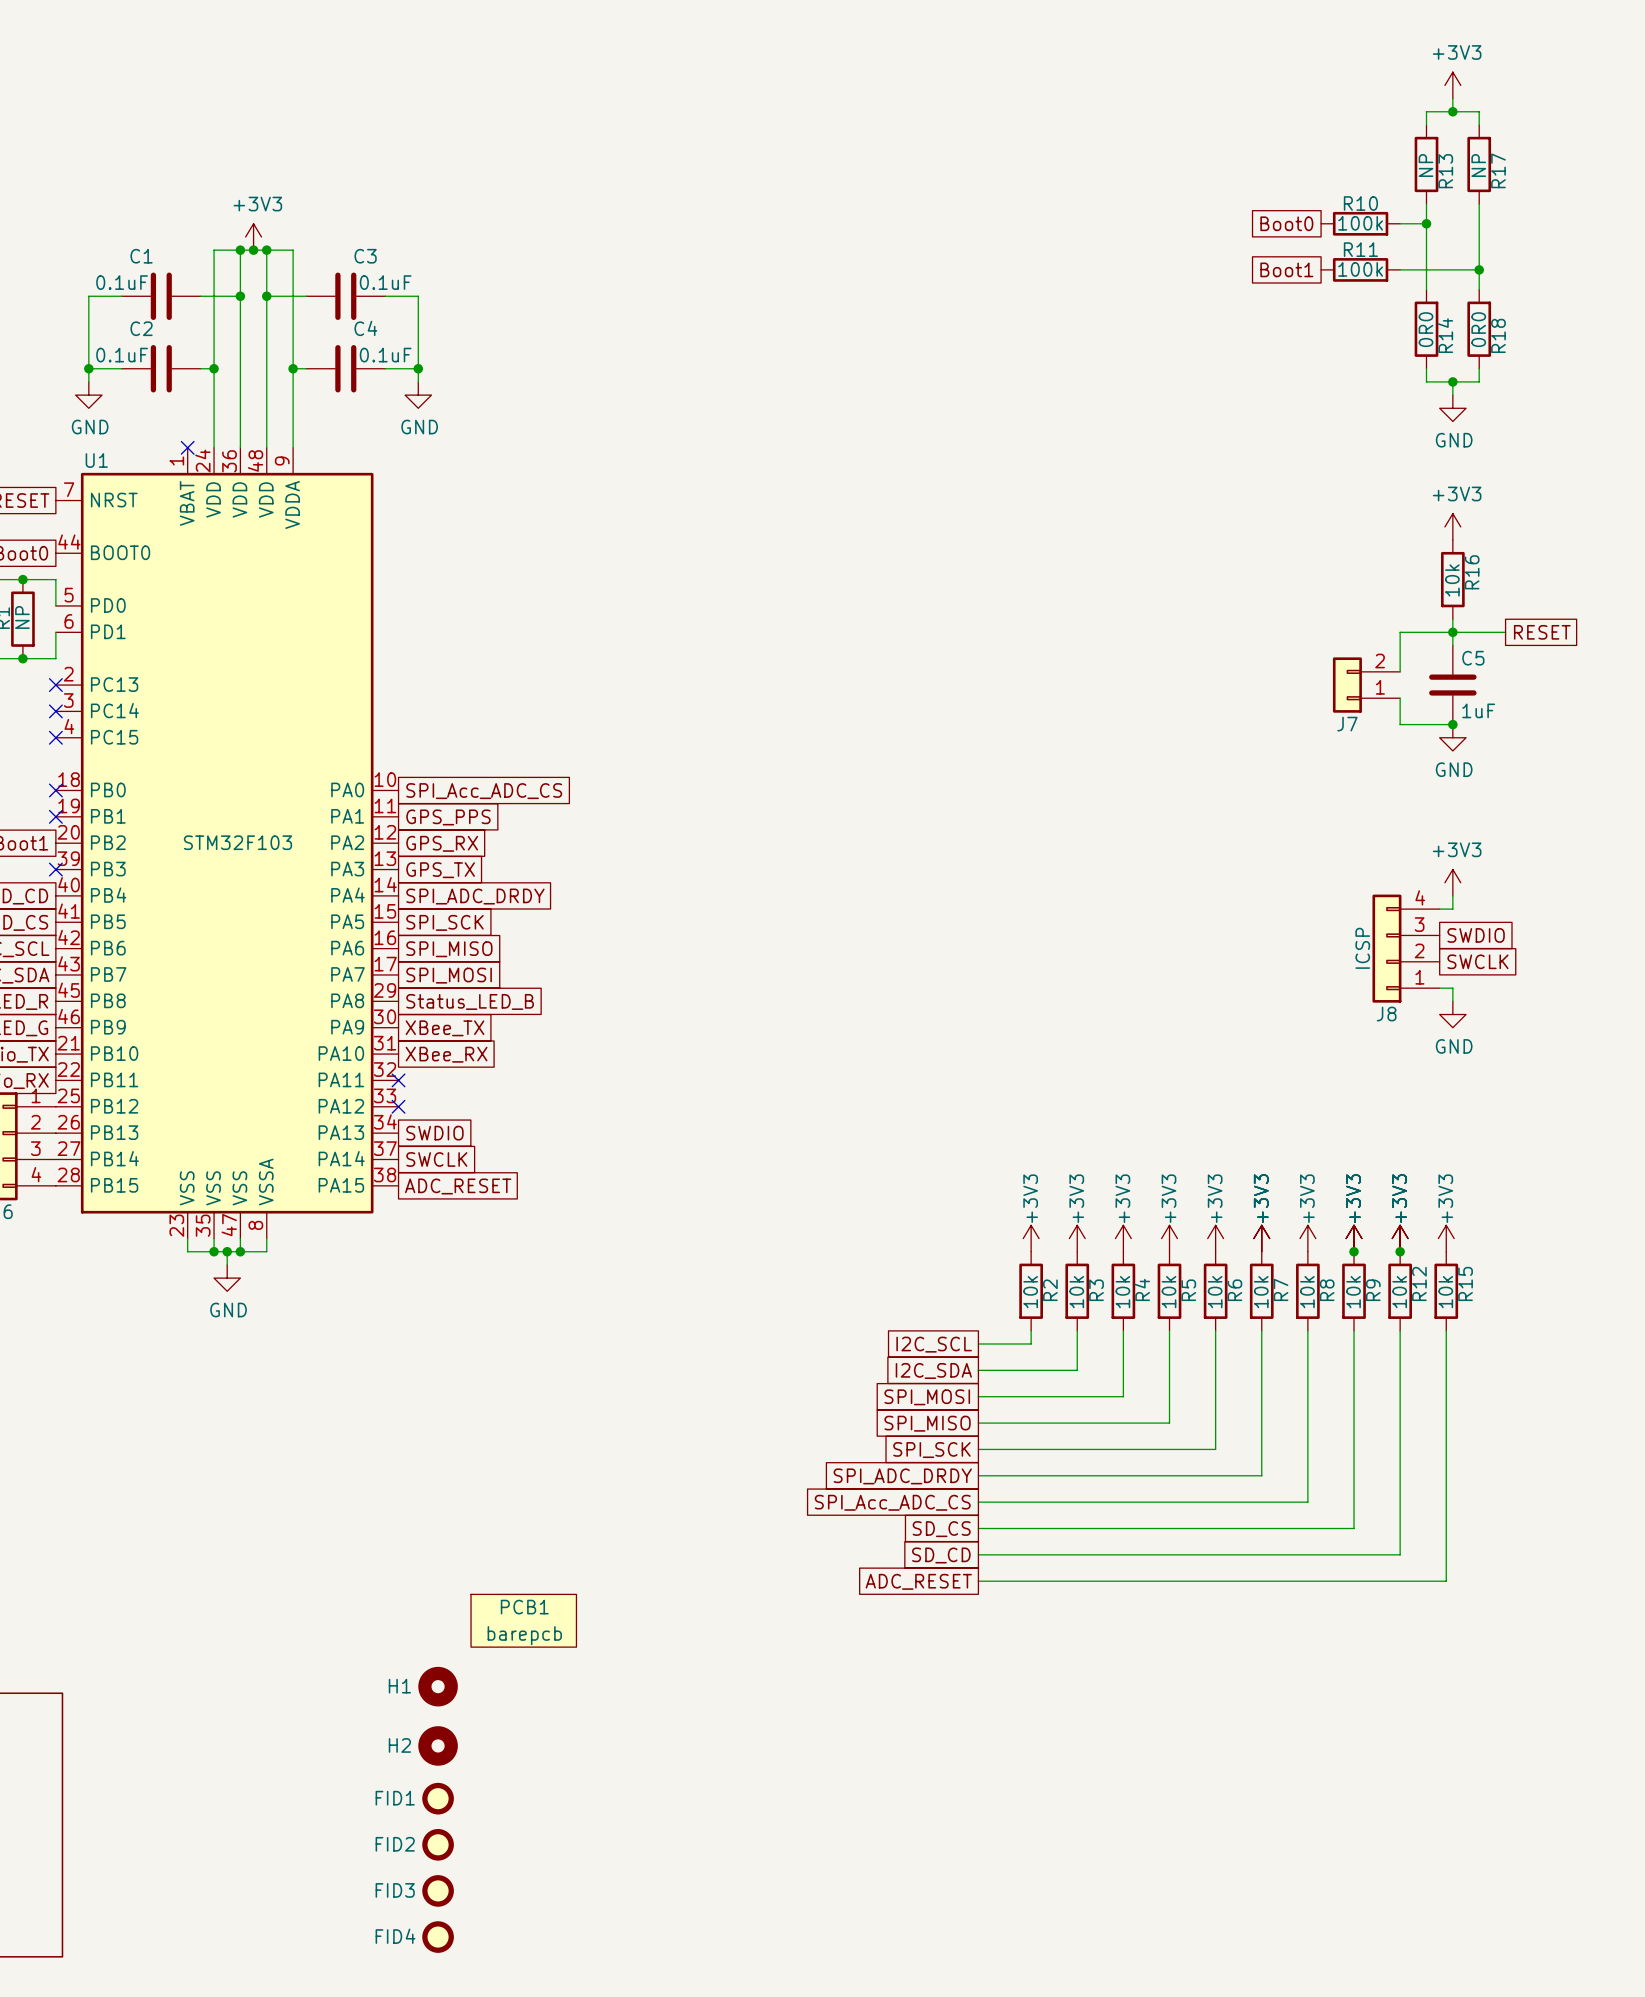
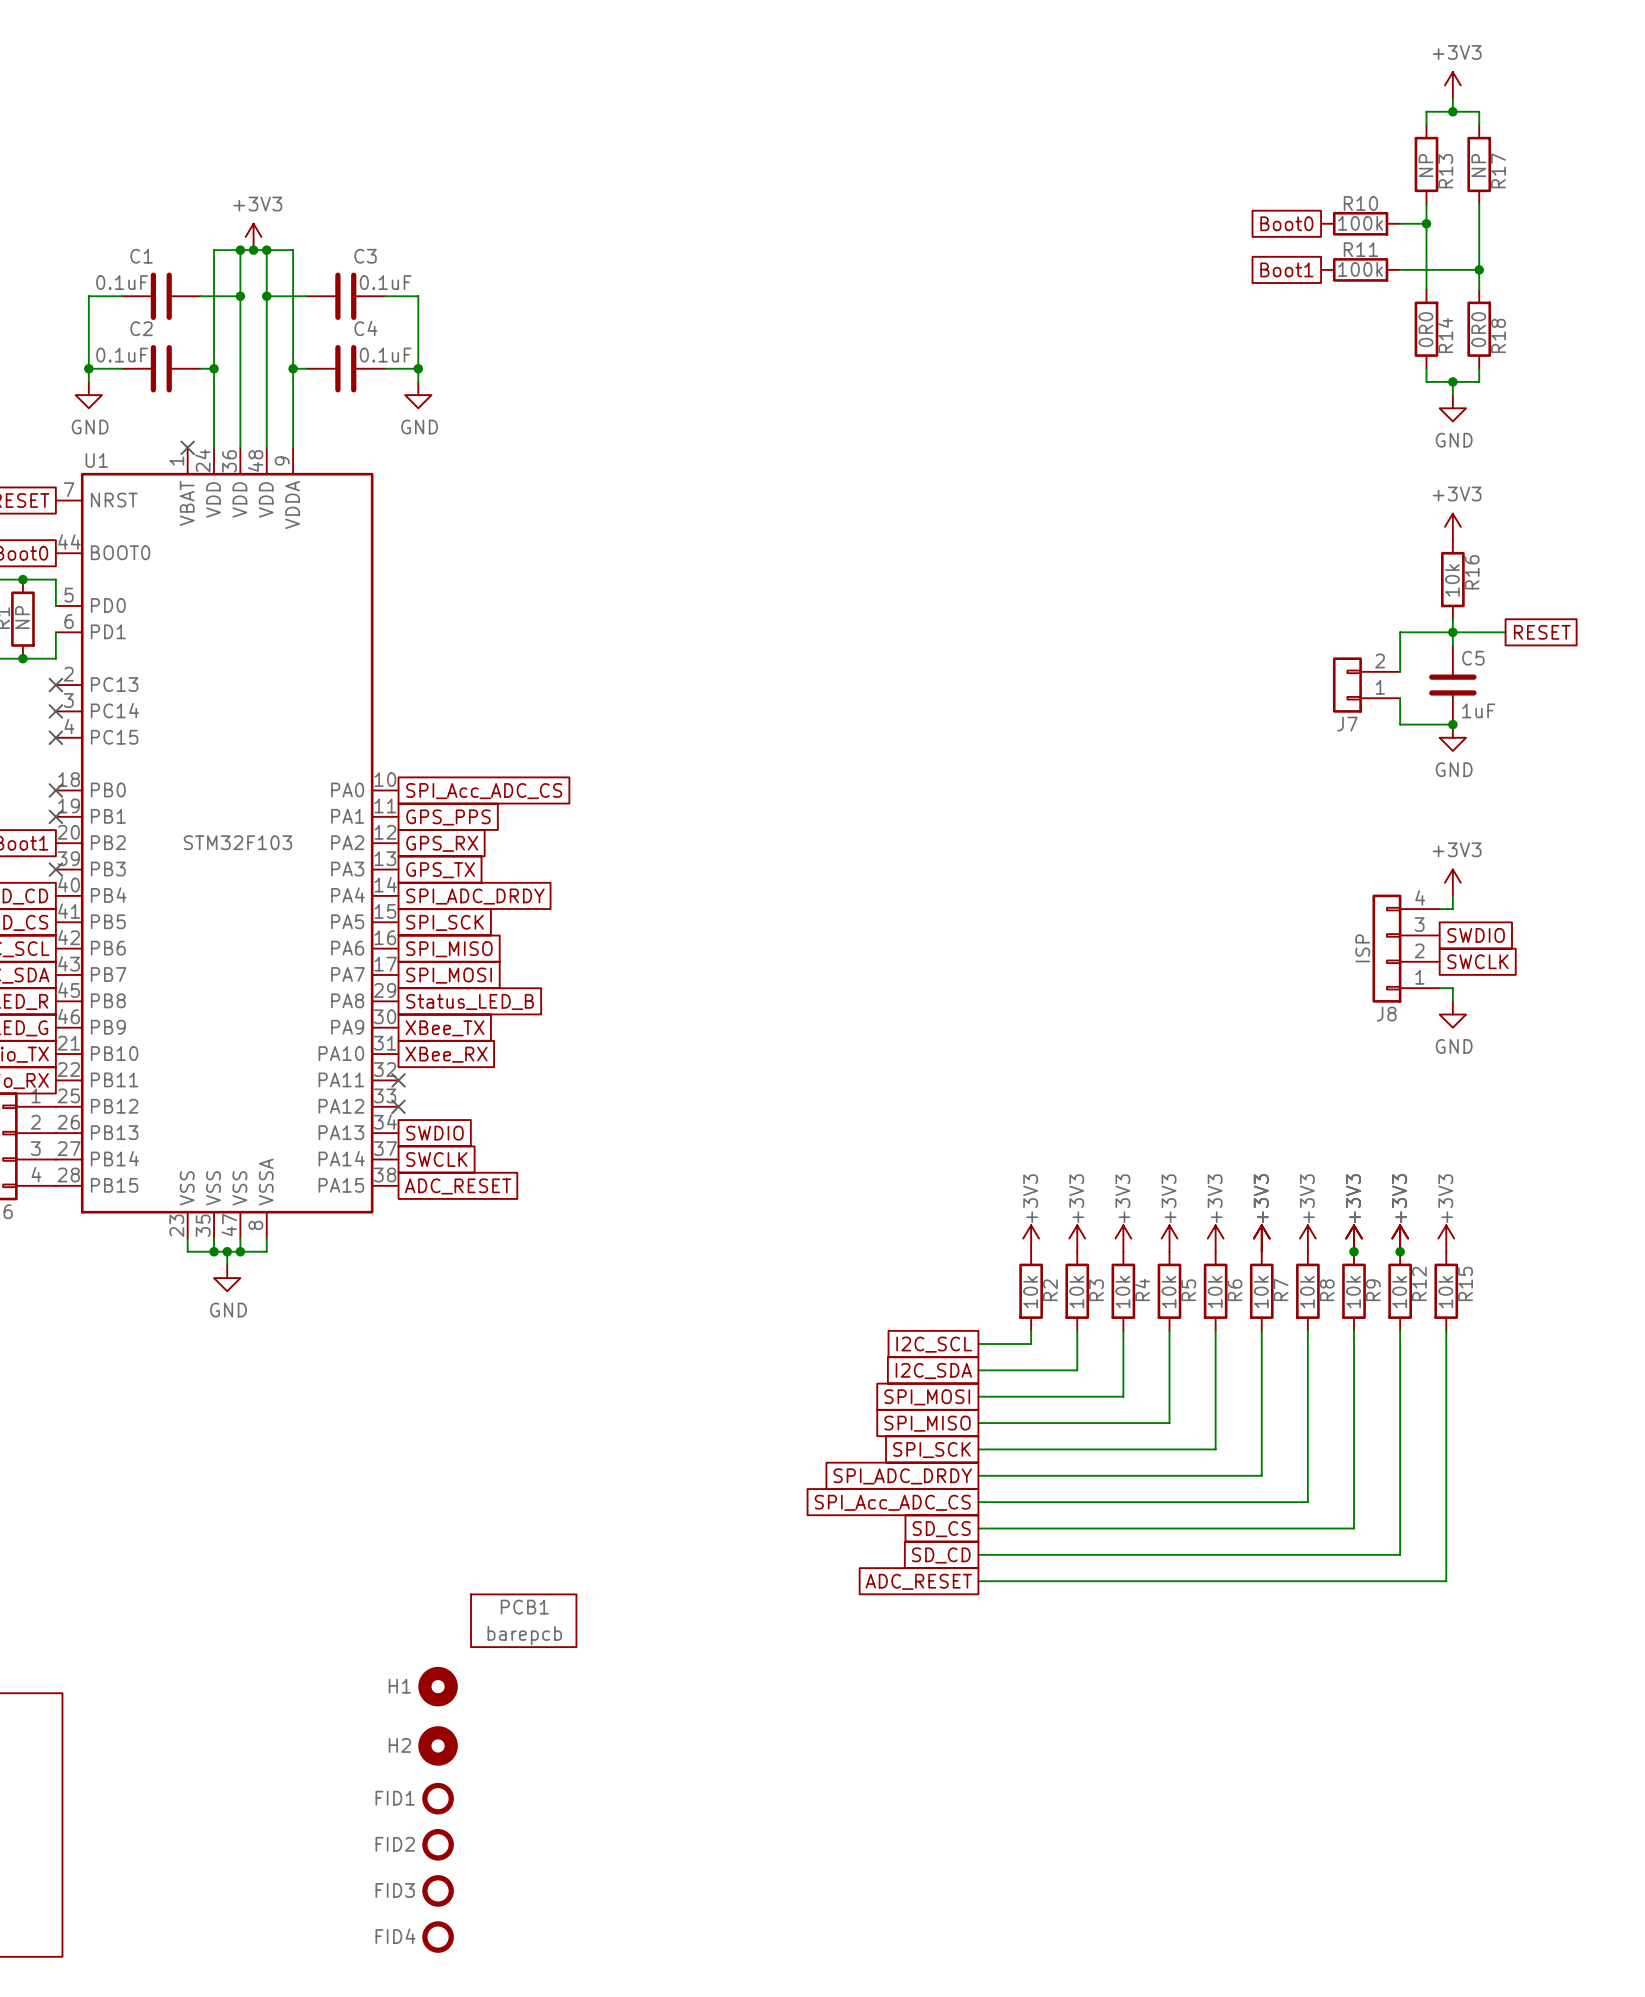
J8 text: ICSP (1362, 948) -> ISP (1362, 948)

